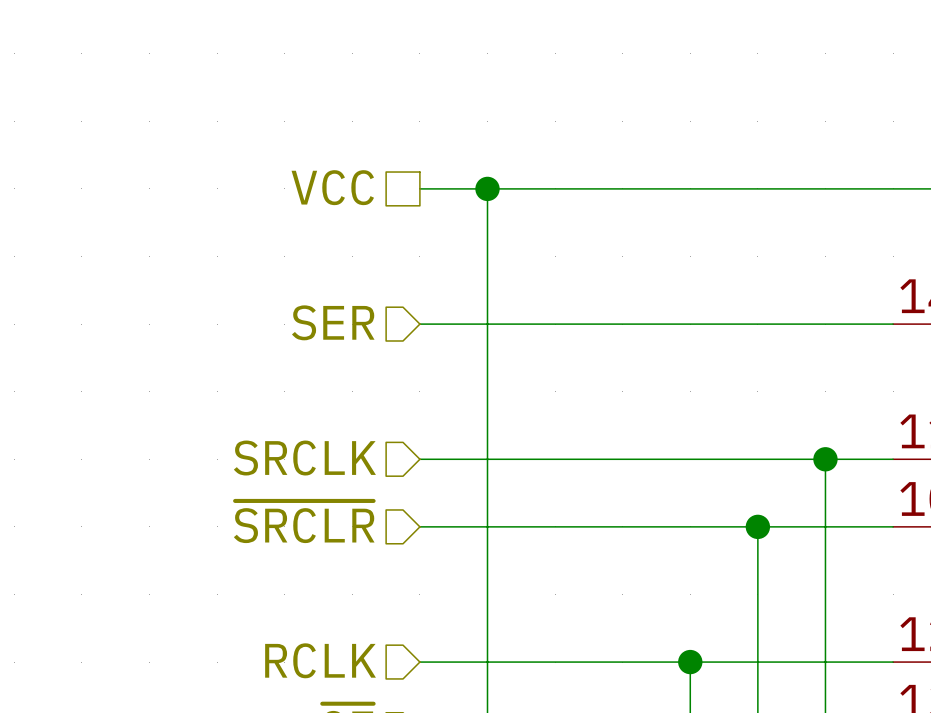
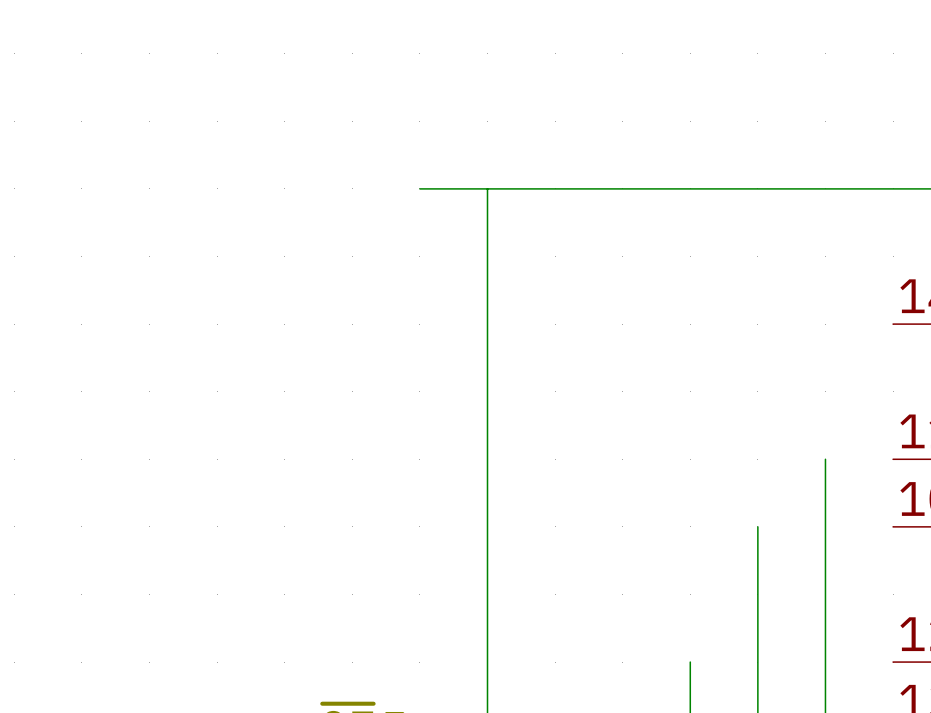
hierarchical label: VCC (332, 187) -> none
junction: (487, 188) -> none
hierarchical label: SER (333, 322) -> none
wire: (419, 324) (893, 324) -> none
hierarchical label: SRCLK (304, 458) -> none
wire: (419, 459) (893, 459) -> none
junction: (825, 459) -> none
hierarchical label: ~{SRCLR} (304, 522) -> none
wire: (419, 526) (893, 526) -> none
junction: (757, 526) -> none
hierarchical label: RCLK (320, 660) -> none
wire: (419, 662) (893, 662) -> none
junction: (690, 662) -> none

